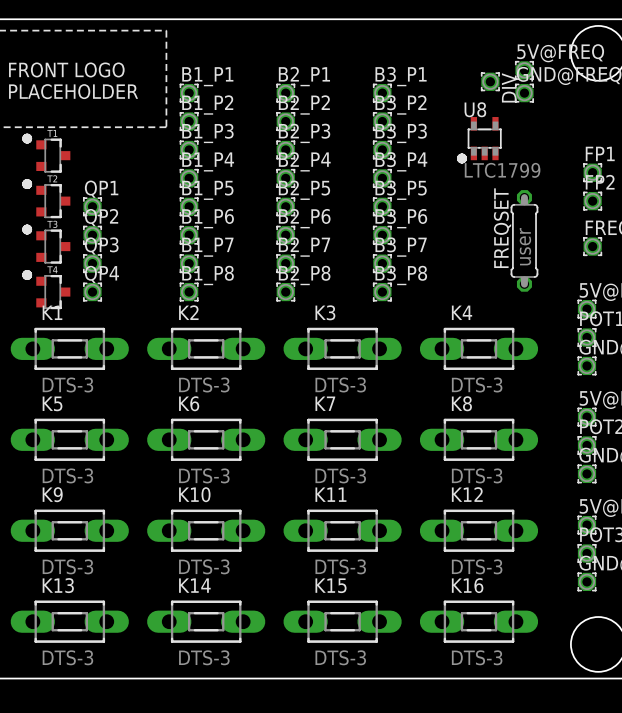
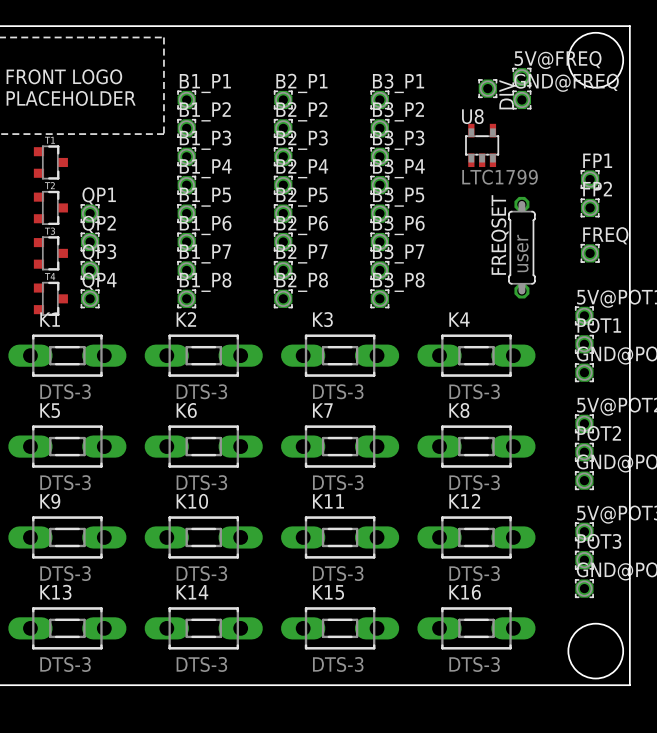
drawing: [22, 133, 33, 144] -> none
drawing: [457, 153, 467, 164] -> none
drawing: [22, 179, 33, 189] -> none
drawing: [22, 224, 33, 235] -> none
drawing: [22, 270, 33, 280] -> none

